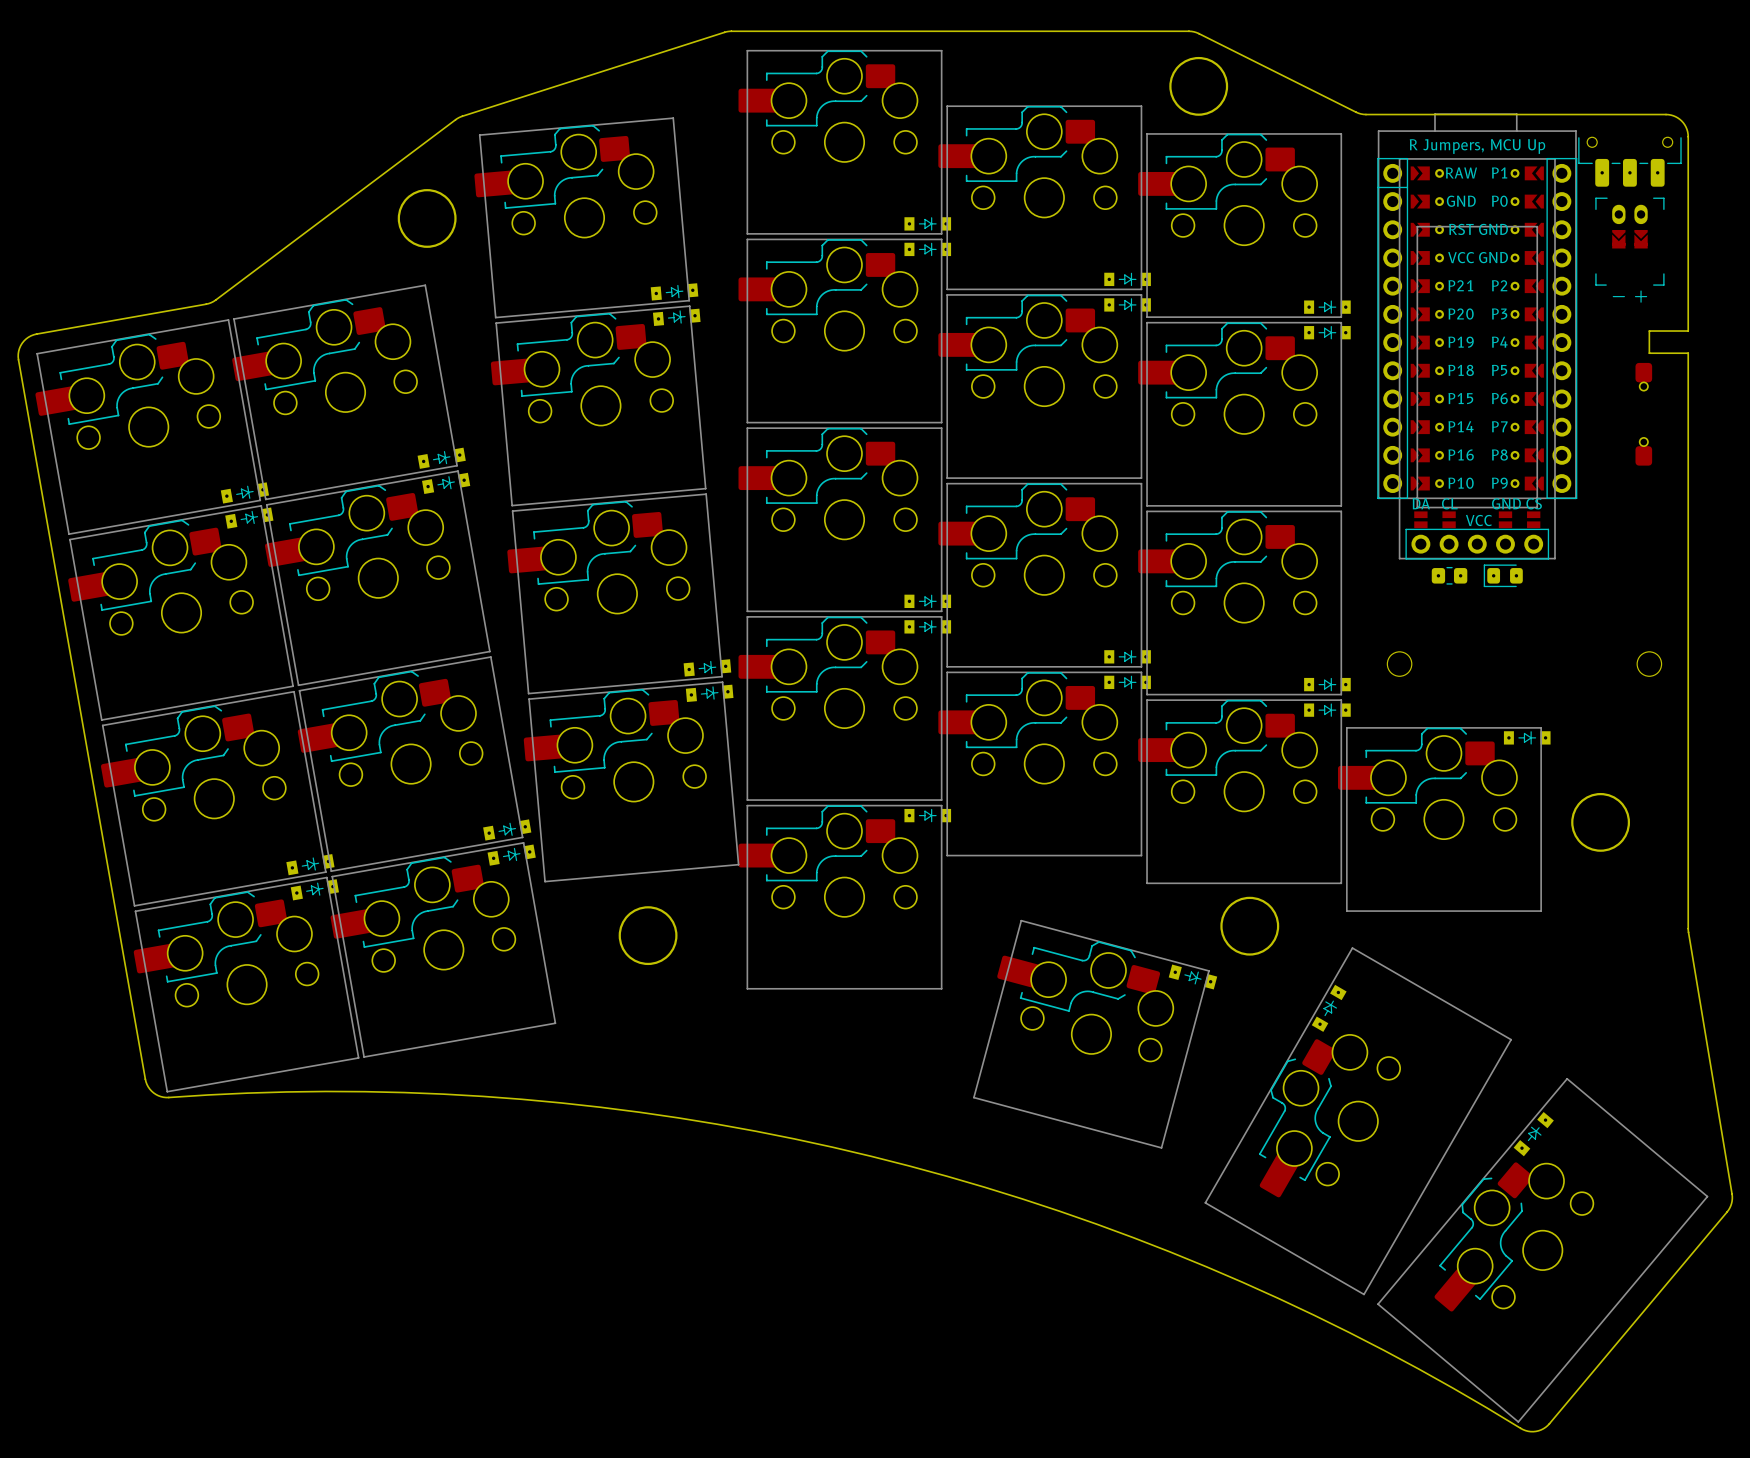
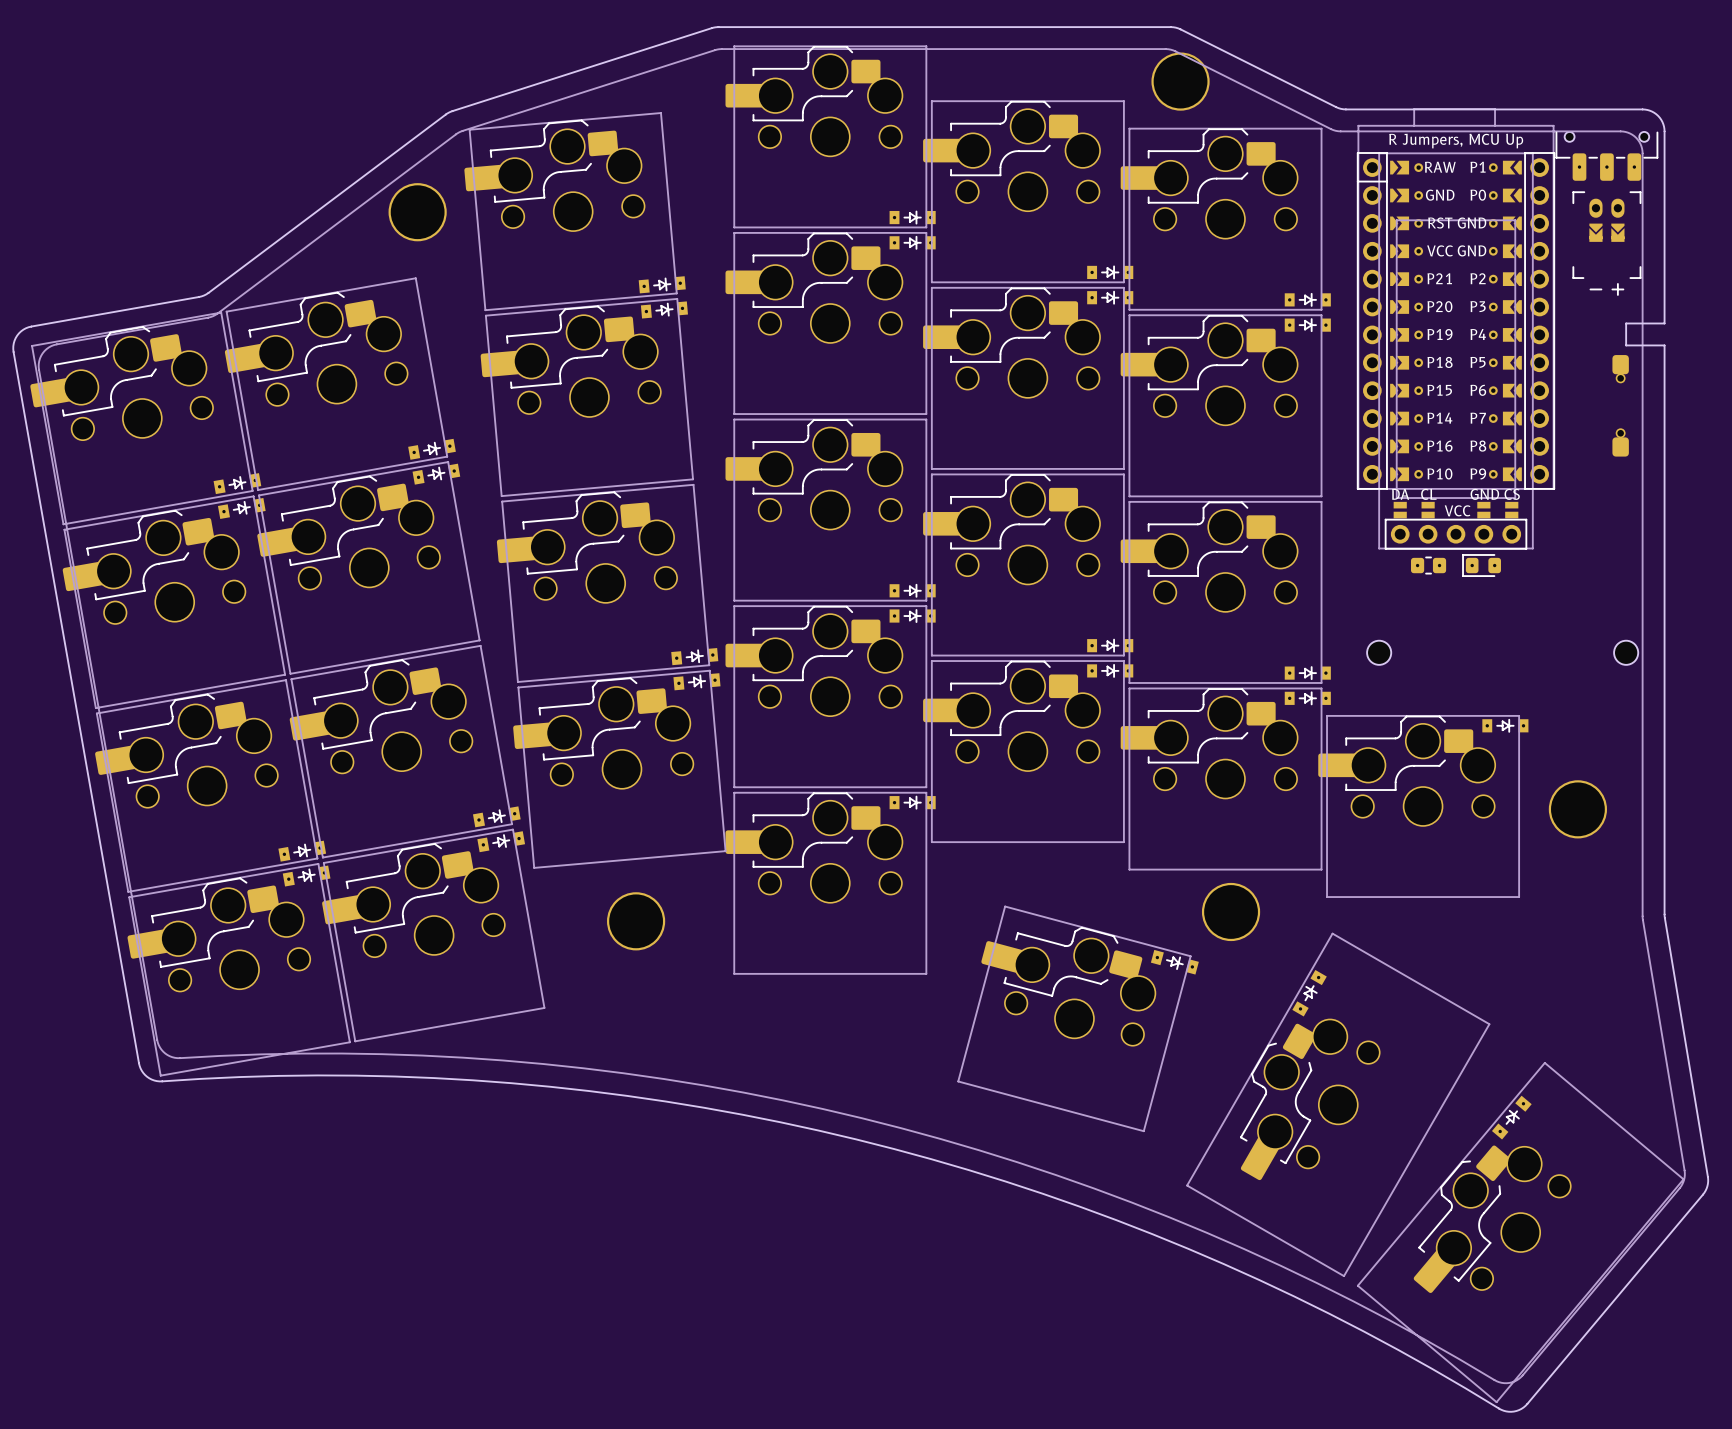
line: none -> (721, 49) (1168, 49) (1335, 130) (1620, 131) (1630, 133) (1639, 141) (1642, 153) (1642, 918) (1684, 1175) (1679, 1188) (1516, 1380) (1506, 1383) (1496, 1381) (1353, 1301) (1243, 1248) (1169, 1217) (1017, 1162) (862, 1118) (703, 1085) (543, 1064) (422, 1055) (341, 1053) (177, 1058) (167, 1055) (159, 1047) (39, 369) (41, 355) (48, 347) (56, 344) (213, 316) (459, 132) (721, 49)

